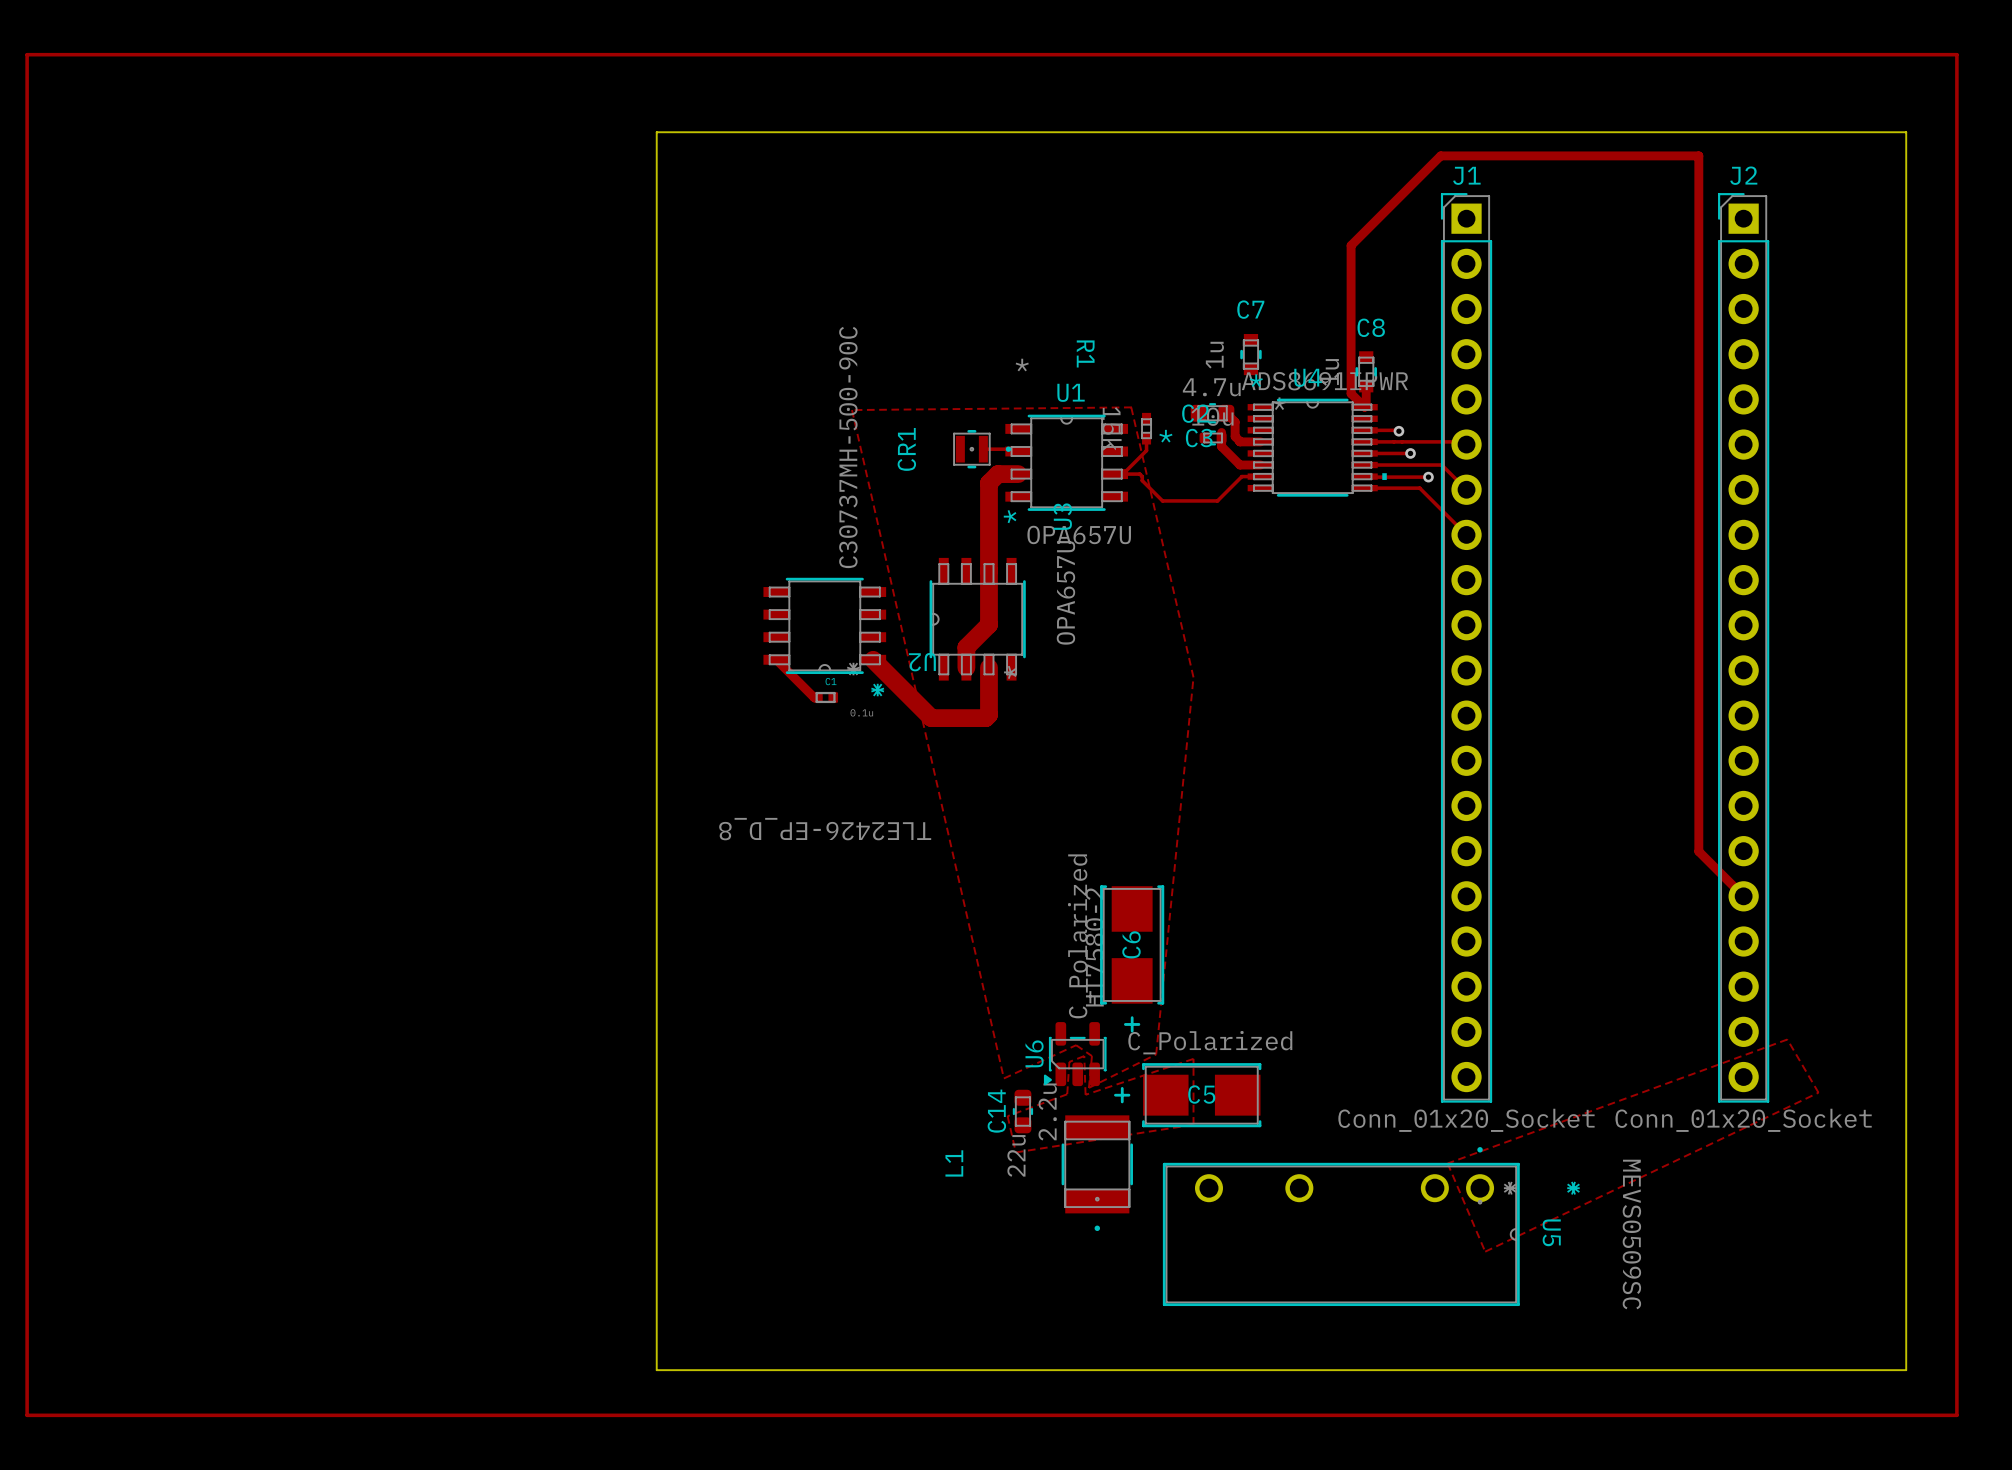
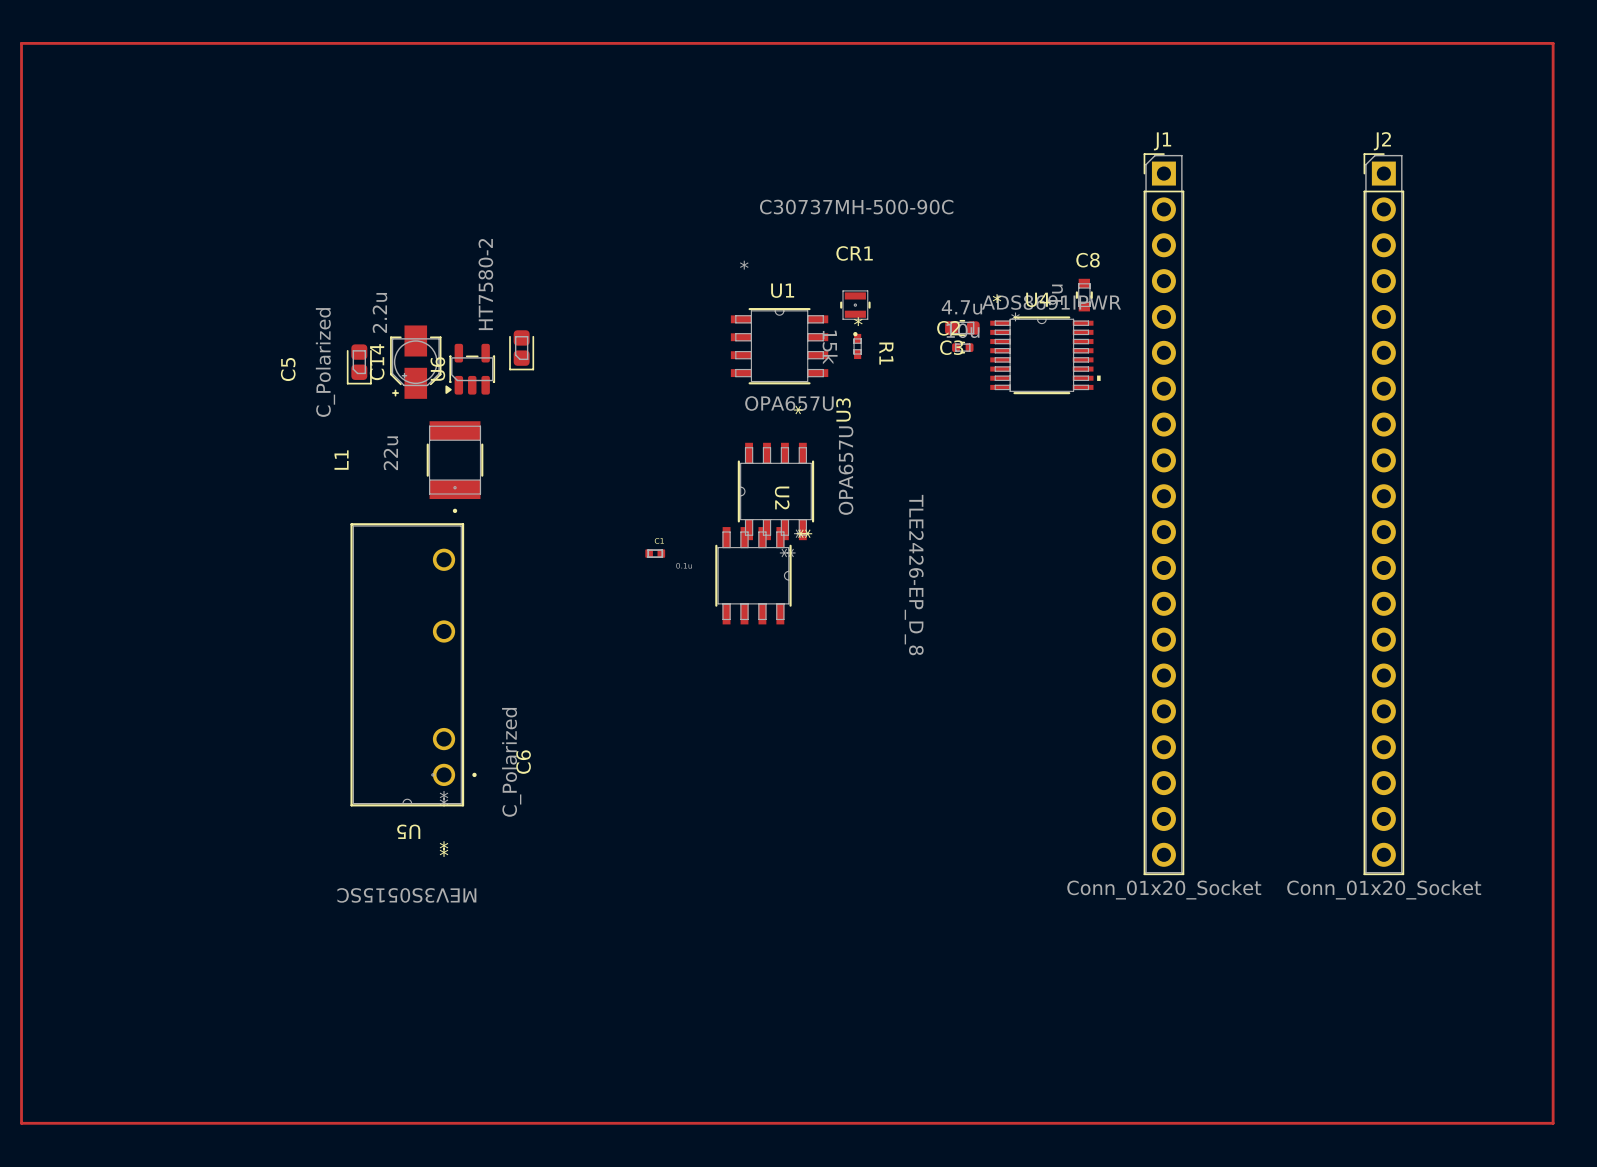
board edge: (656, 132) (1906, 132) (1906, 1370) (656, 1370) (656, 132) -> none
R1 name position: R1 (1085, 353) -> R1 (886, 353)
C7: 1u (1250, 354) -> none
track: (1366, 386) (1364, 407) (1351, 393) (1351, 245) (1440, 155) (1698, 155) (1698, 851) (1743, 896) -> none
zone outline: (1131, 407) (1193, 677) (1156, 1054) (1088, 1087) (1091, 1056) (1076, 1045) (1003, 1078) (852, 410) (1131, 407) -> none
track: (1226, 413) (1235, 422) (1235, 436) (1240, 441) (1260, 441) -> none
R1 position: (1146, 428) -> (857, 346)
track: (1364, 430) (1398, 431) -> none
via: (1398, 431) -> none
track: (1221, 432) (1221, 446) (1240, 465) (1260, 465) -> none
track: (1146, 438) (1146, 450) (1123, 474) -> none
track: (1364, 441) (1463, 441) (1466, 444) -> none
CR1 rotation: 0° (982, 449) -> 90° clockwise (855, 313)
CR1 position: (982, 449) -> (855, 313)
track: (983, 449) (1015, 449) (1018, 451) -> none
track: (1364, 453) (1410, 453) -> none
via: (1410, 453) -> none
U1 position: (1066, 462) -> (779, 346)
track: (1364, 465) (1441, 465) (1466, 489) -> none
track: (1018, 474) (998, 474) (988, 483) (988, 624) (966, 647) (966, 667) -> none
track: (1115, 474) (1139, 474) (1142, 480) (1162, 500) (1217, 500) (1241, 476) (1260, 476) -> none
track: (1364, 476) (1428, 477) -> none
via: (1428, 477) -> none
track: (1364, 488) (1419, 488) (1466, 534) -> none
U2 rotation: 0° (824, 625) -> 90° counterclockwise (753, 575)
U2 position: (824, 625) -> (753, 575)
track: (776, 659) (814, 697) (817, 697) -> none
track: (873, 659) (931, 718) (985, 718) (988, 714) (988, 667) -> none
C6 footprint: [1100, 885, 1165, 1033] -> [509, 330, 535, 371]
C6 value position: C_Polarized (1079, 936) -> C_Polarized (511, 762)
C6 name position: C6 (1131, 944) -> C6 (523, 762)
zone outline: (1787, 1039) (1818, 1092) (1485, 1251) (1447, 1163) (1787, 1039) -> none
C5 value position: C_Polarized (1210, 1042) -> C_Polarized (325, 362)
U6 position: (1075, 1054) -> (470, 369)
zone outline: (1084, 1056) (1085, 1094) (1193, 1058) (1193, 1124) (1015, 1152) (1007, 1116) (1067, 1094) (1069, 1061) (1084, 1056) -> none
C5 footprint: [1114, 1063, 1262, 1128] -> [346, 344, 372, 385]
C14 footprint: [1012, 1089, 1034, 1134] -> [390, 325, 442, 399]
C5 name position: C5 (1201, 1094) -> C5 (288, 369)
C14 value position: 2.2u (1047, 1111) -> 2.2u (379, 312)
L1 position: (1097, 1173) -> (455, 467)
U5 rotation: 0° (1341, 1226) -> 90° clockwise (413, 664)
U5 position: (1341, 1226) -> (413, 664)
U5 value: MEVS0509SC (1631, 1234) -> MEV3S0515SC (406, 895)

